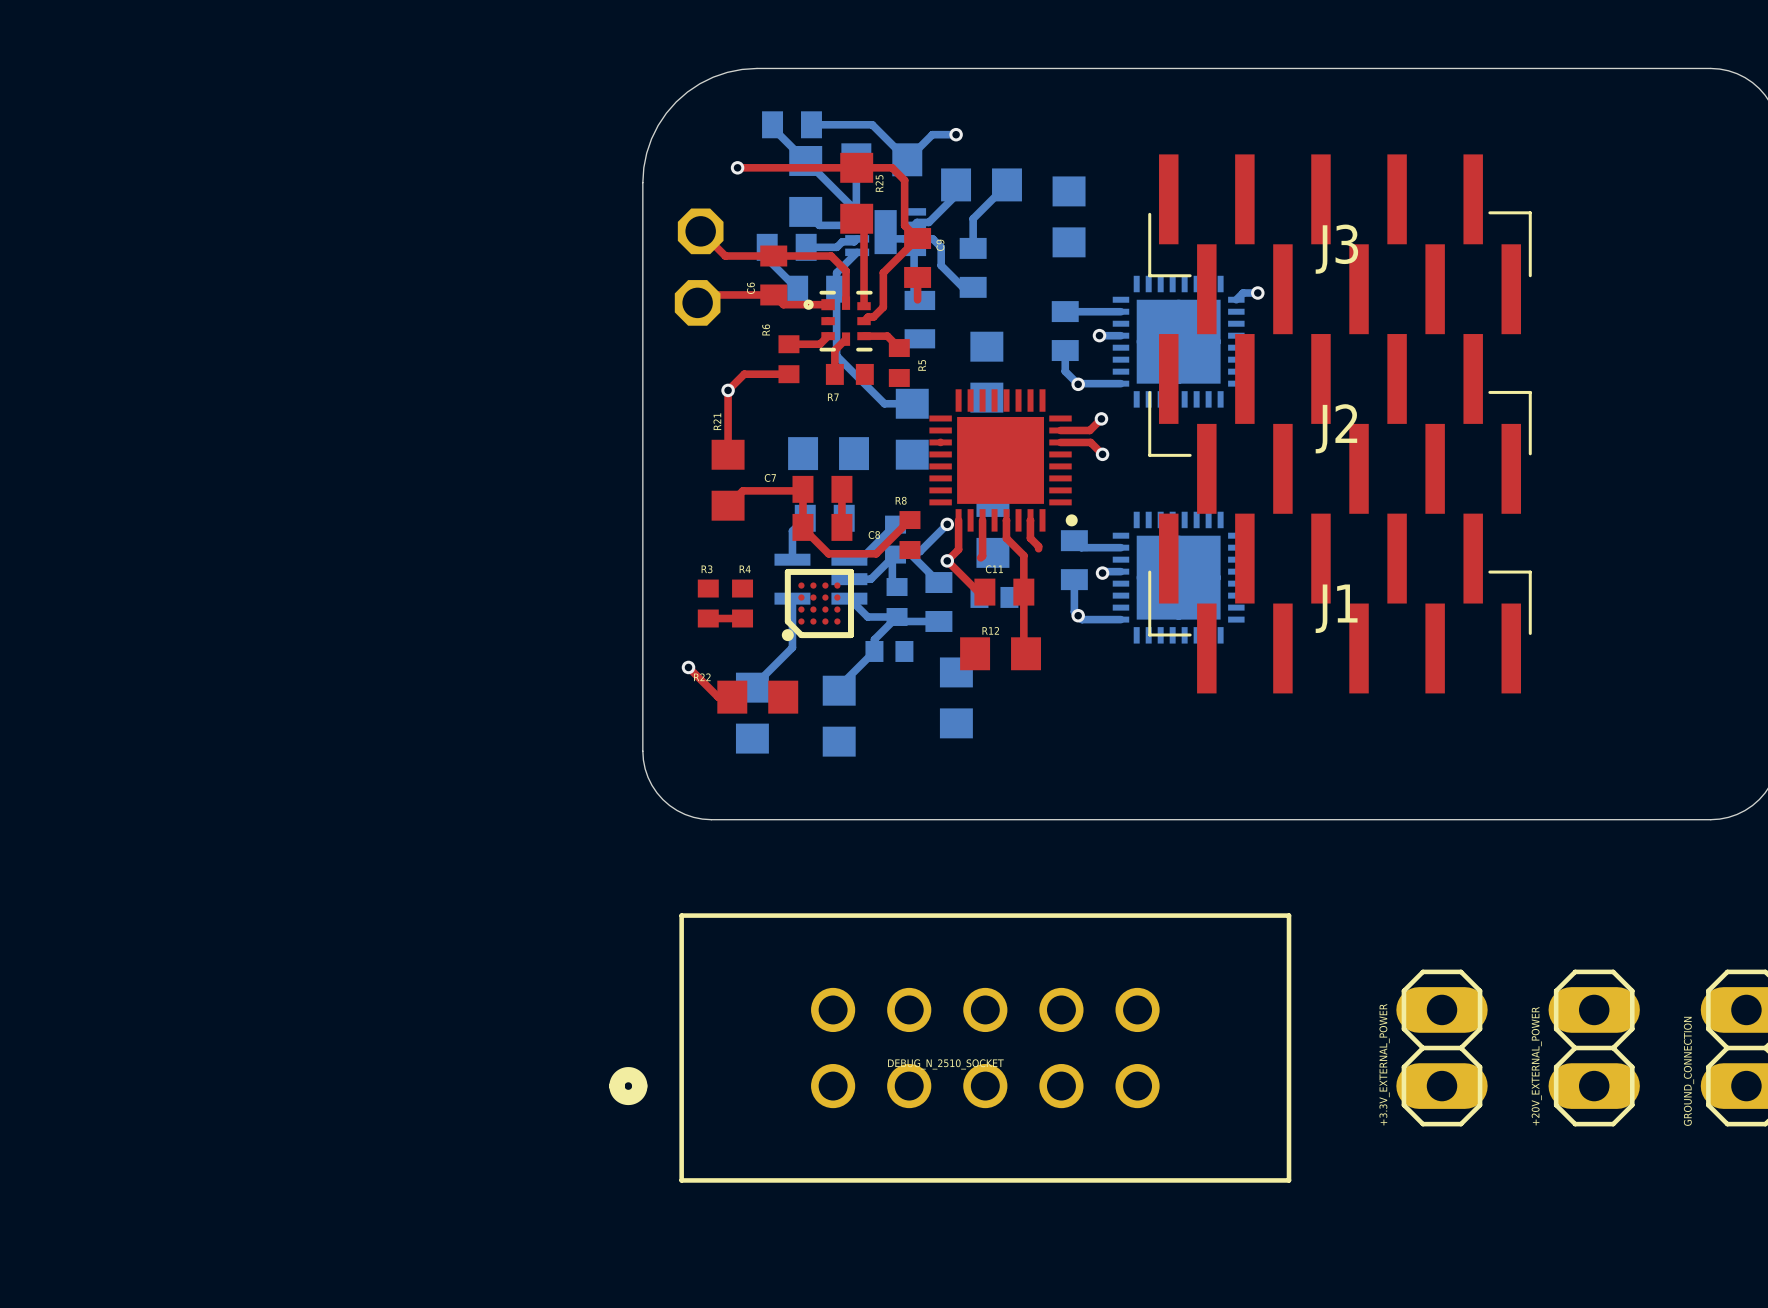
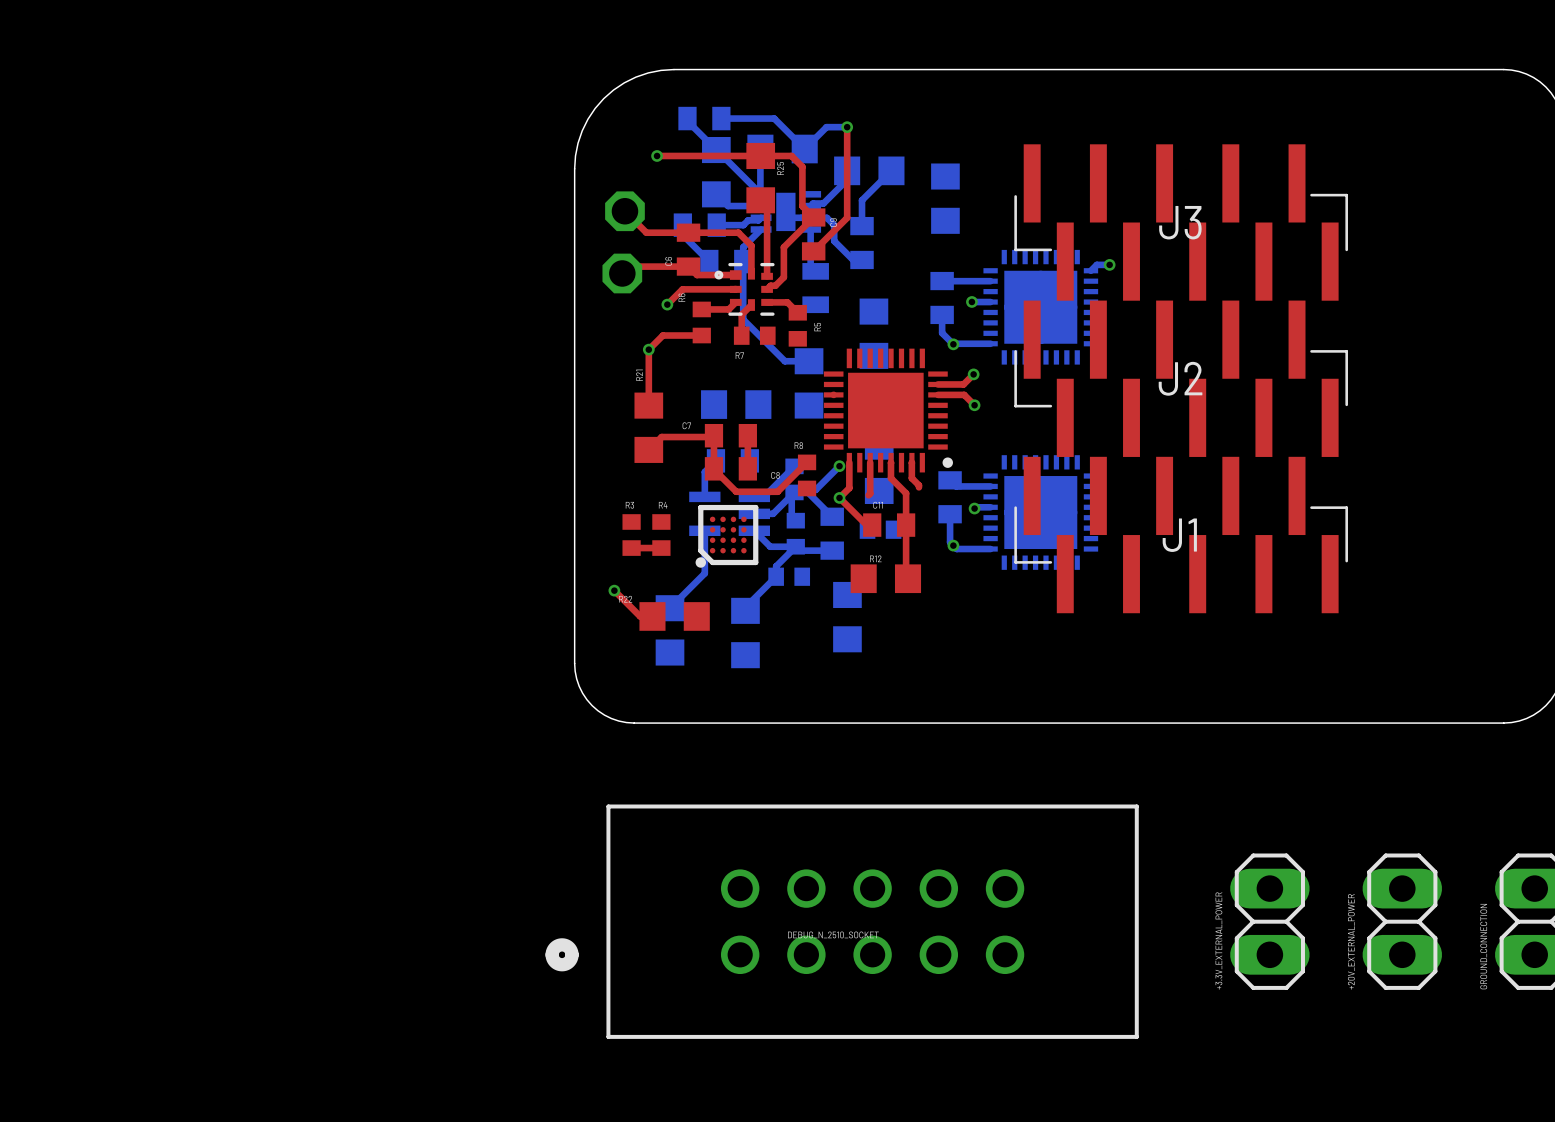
top track: (917, 277) (917, 299) -> (813, 251) (847, 217) (847, 127)
top track: none -> (735, 289) (682, 289) (667, 304)
via: none -> (667, 304)

